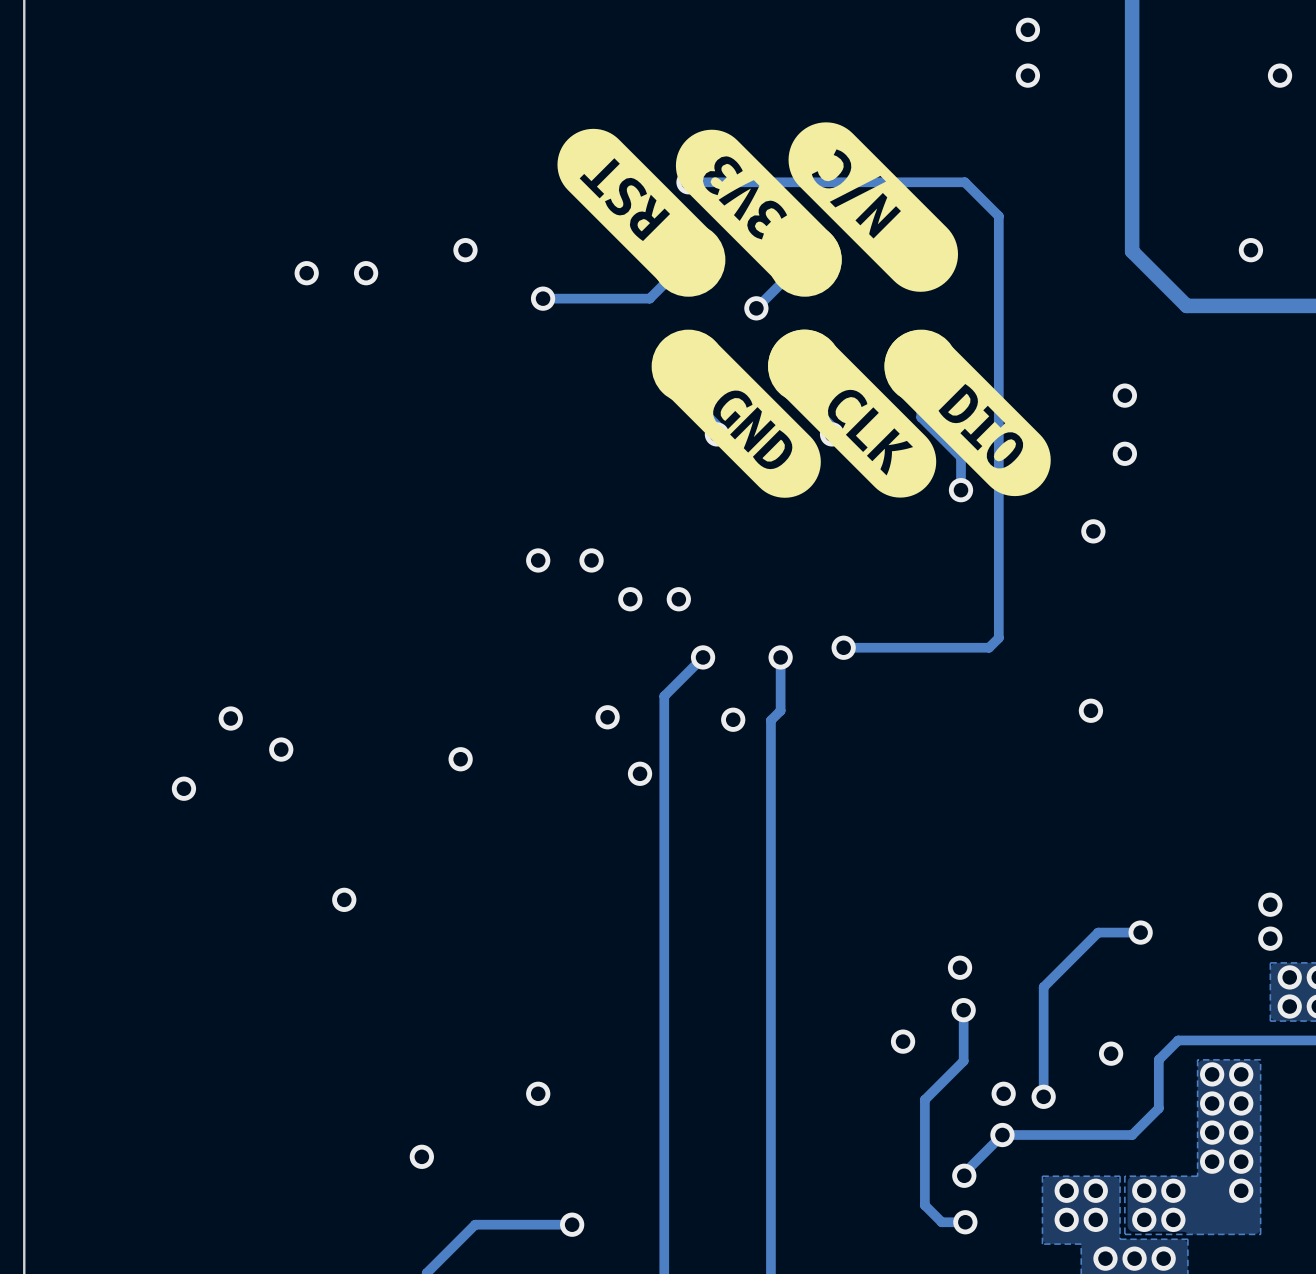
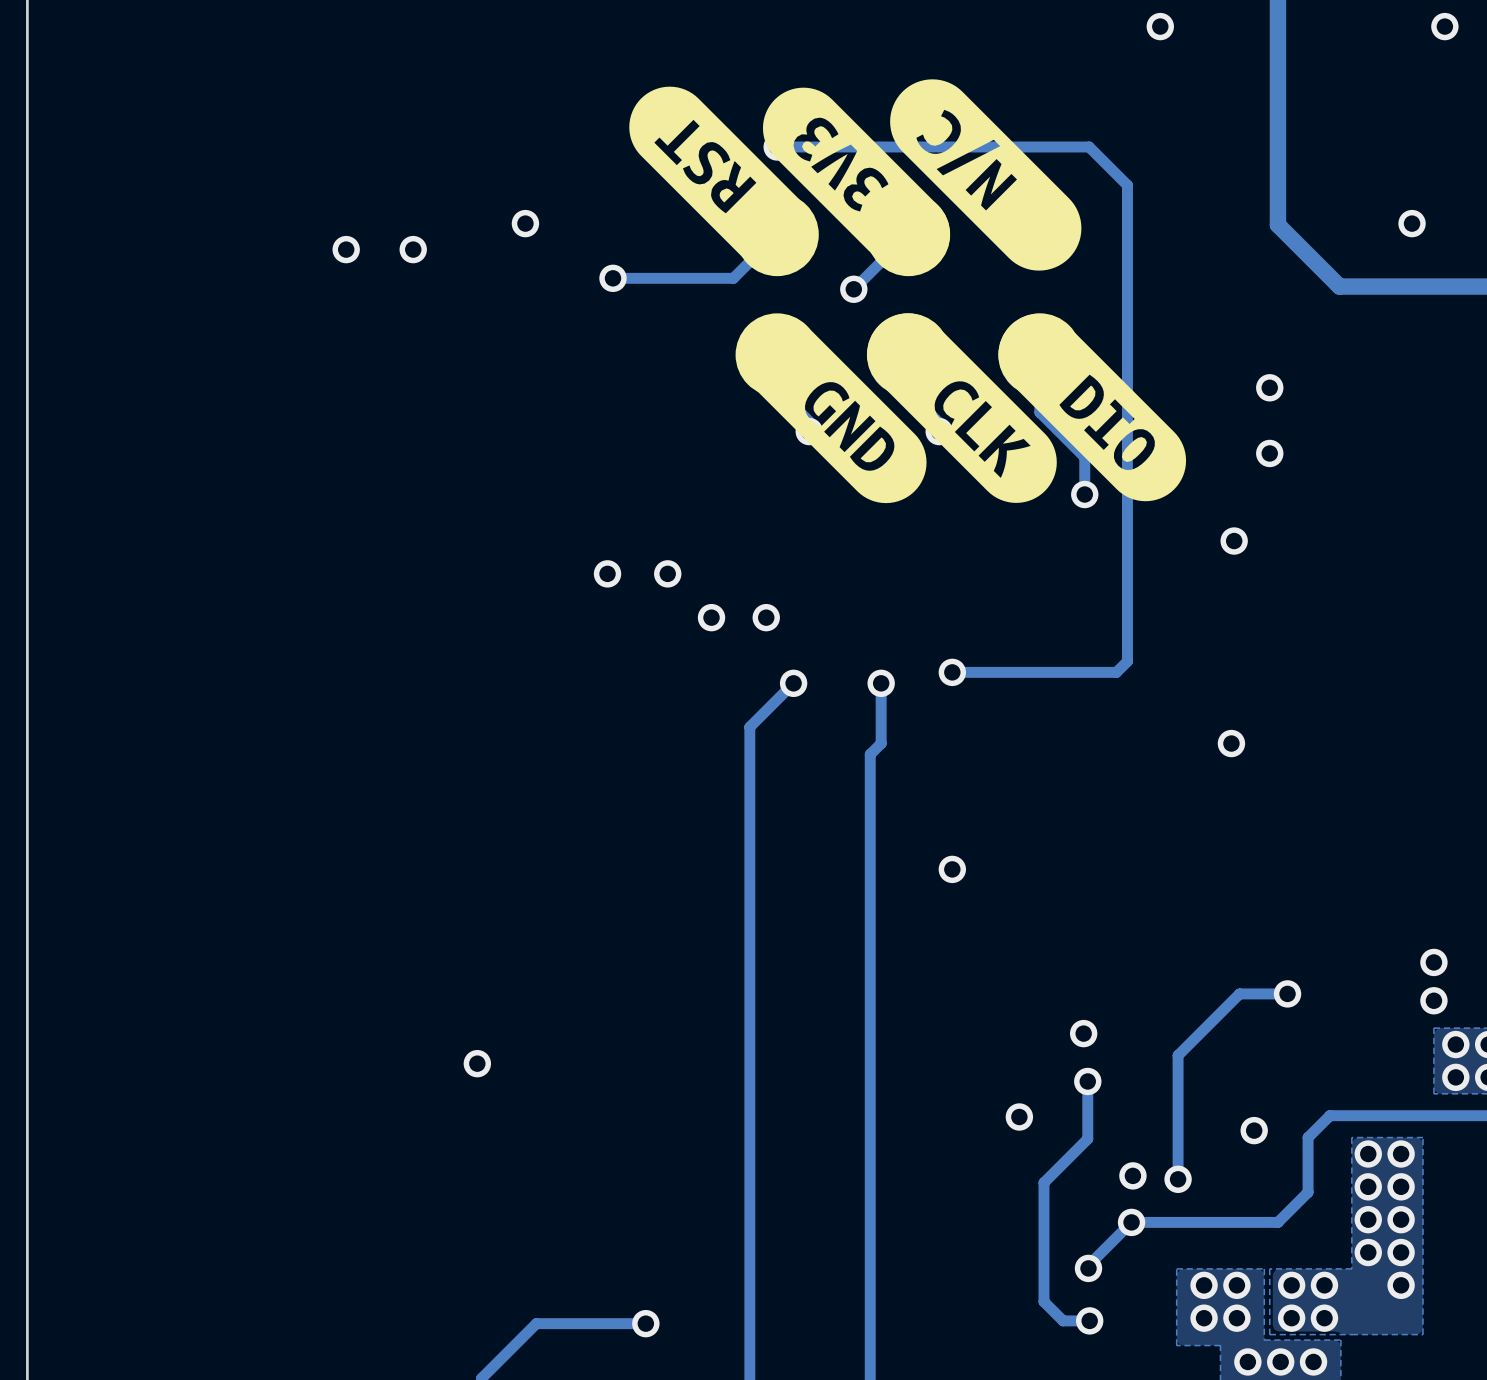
via: (607, 717) -> none
via: (230, 718) -> none
via: (733, 719) -> none
via: (281, 749) -> none
via: (460, 759) -> none
via: (640, 773) -> none
via: (183, 788) -> none
via: none -> (952, 869)
via: (344, 899) -> none
via: none -> (477, 1063)
via: (538, 1093) -> none
via: (421, 1156) -> none

